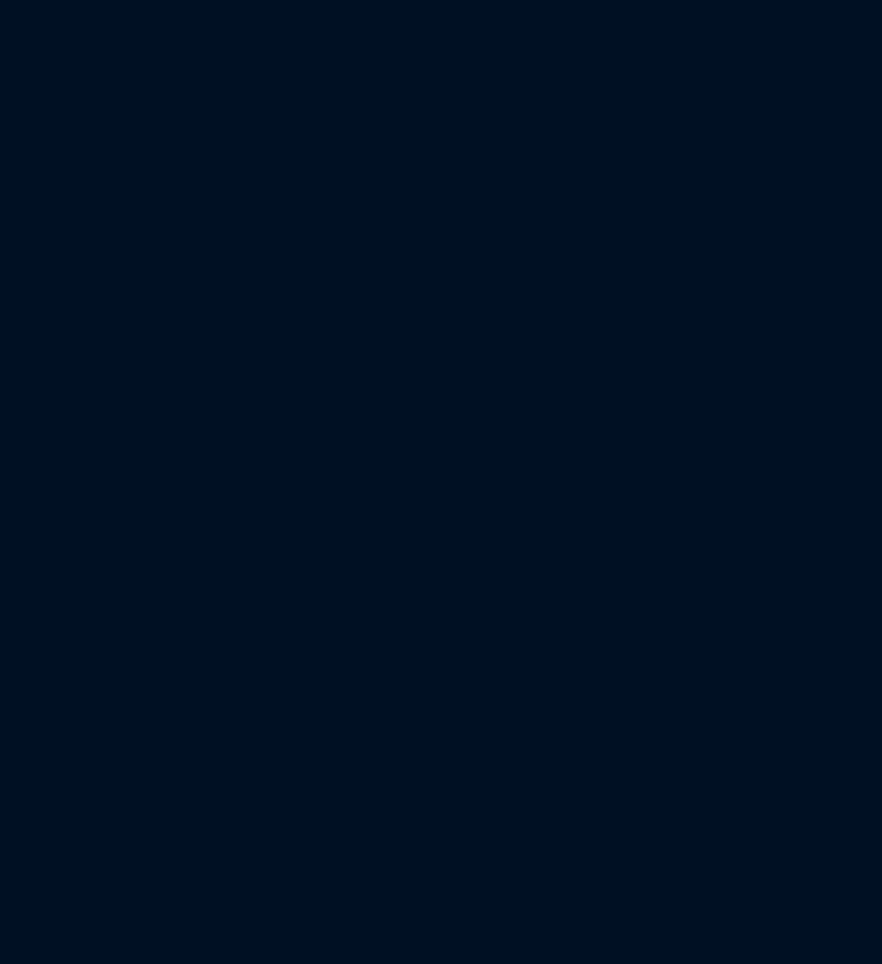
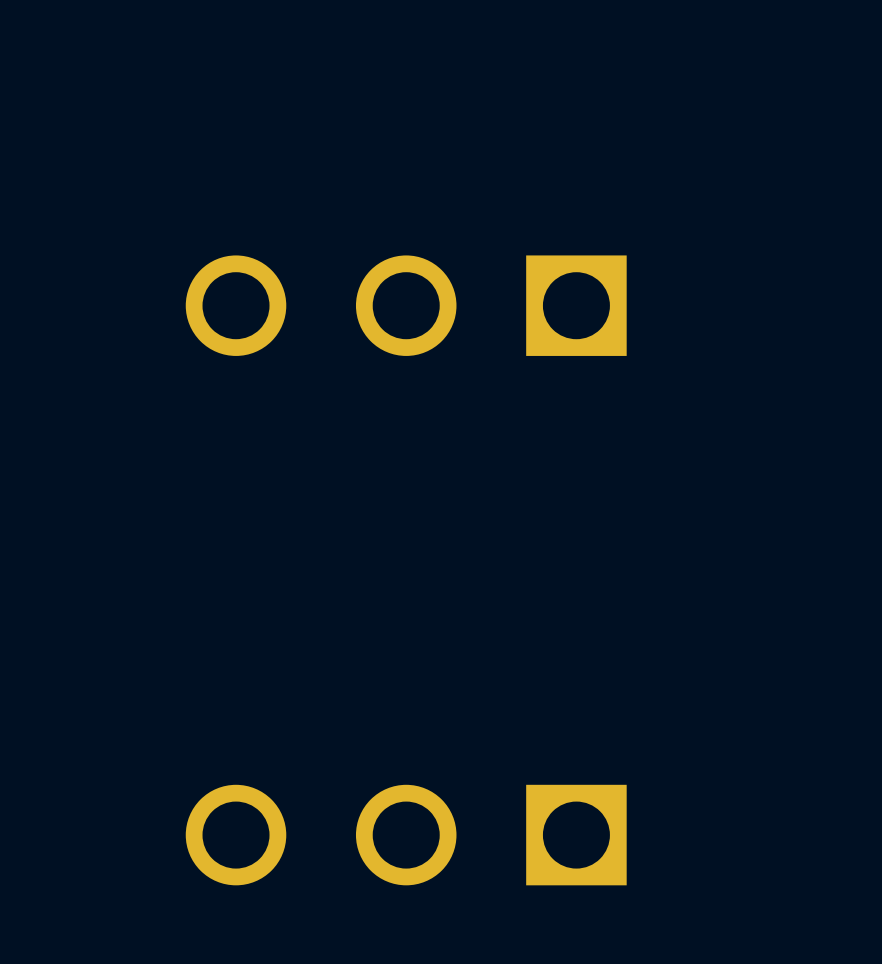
part: none -> (406, 305)
part: none -> (406, 835)

